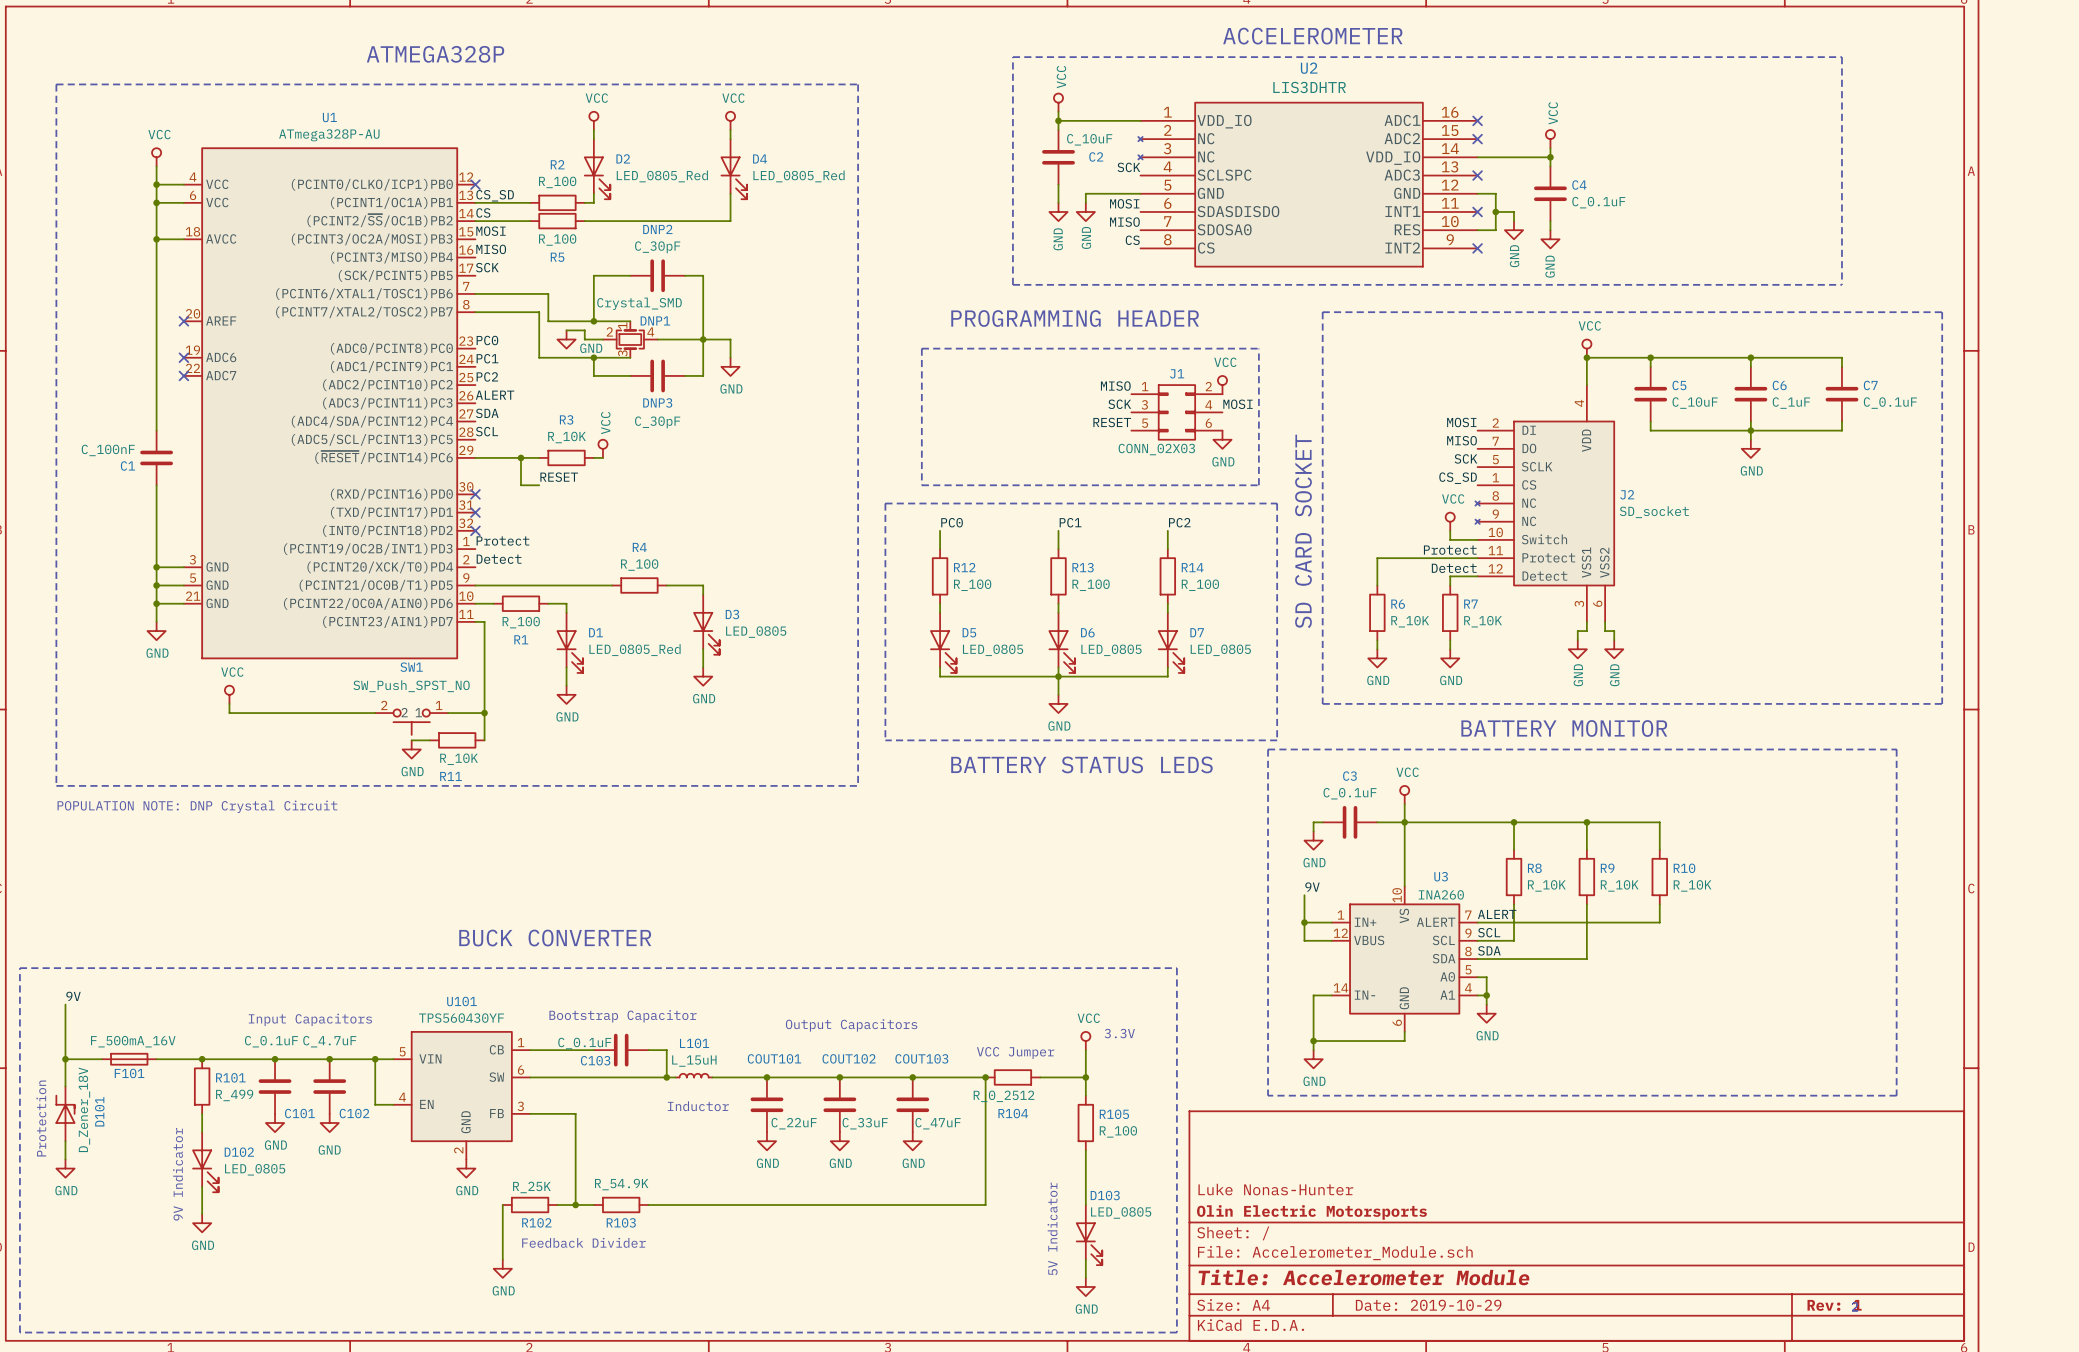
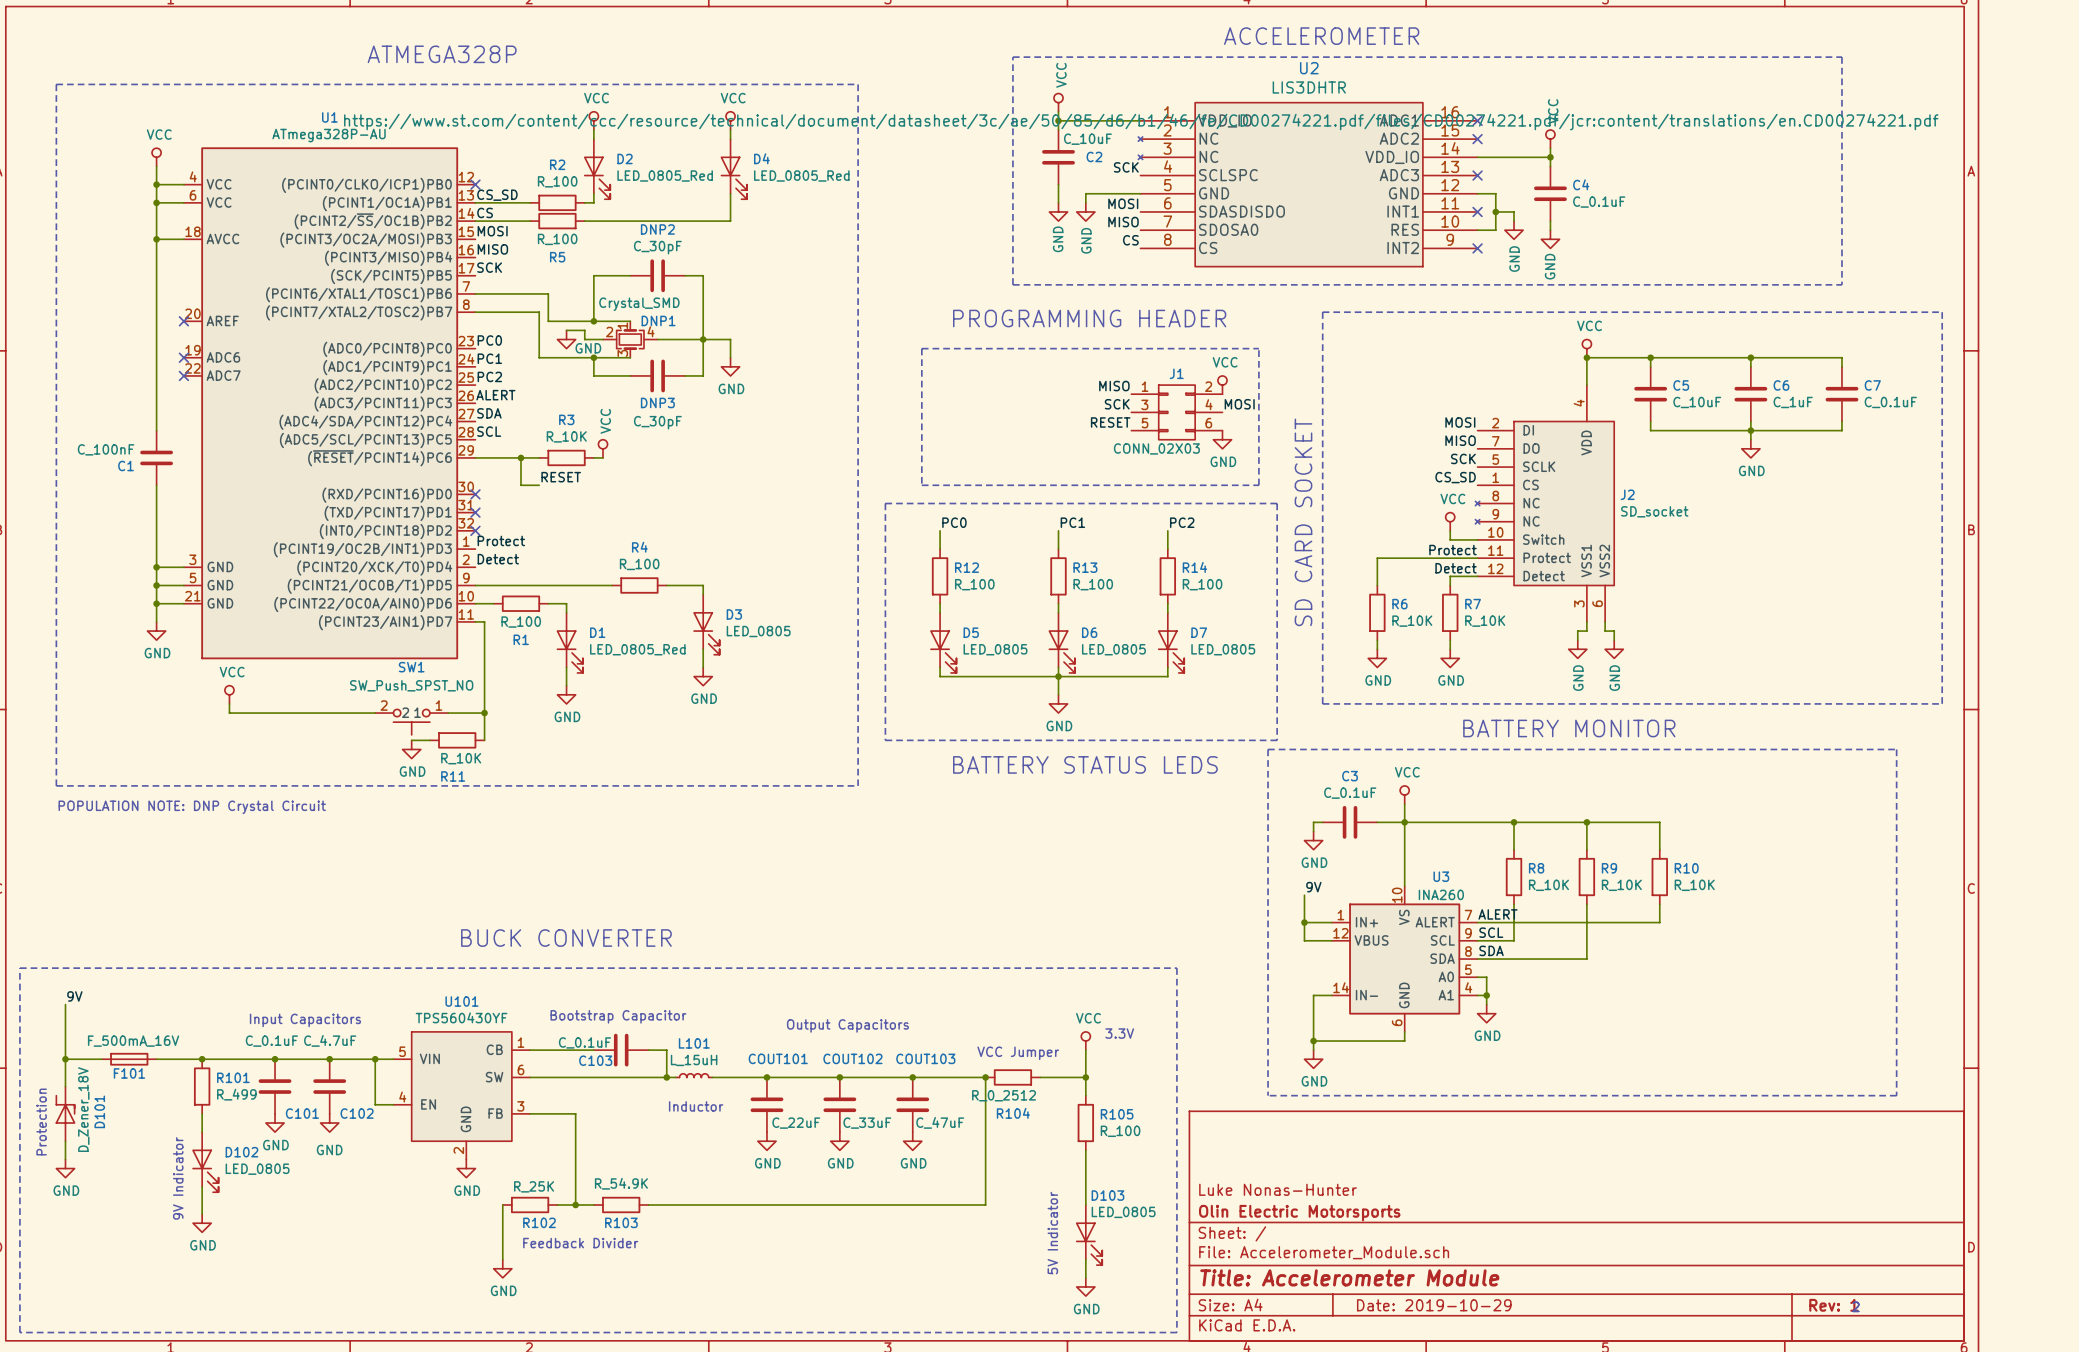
U2 text: none -> https://www.st.com/content/ccc/resource/technical/document/datasheet/3c/ae/50/85/d6/b1/46/fe/CD00274221.pdf/files/CD00274221.pdf/jcr:content/translations/en.CD00274221.pdf (1141, 122)

